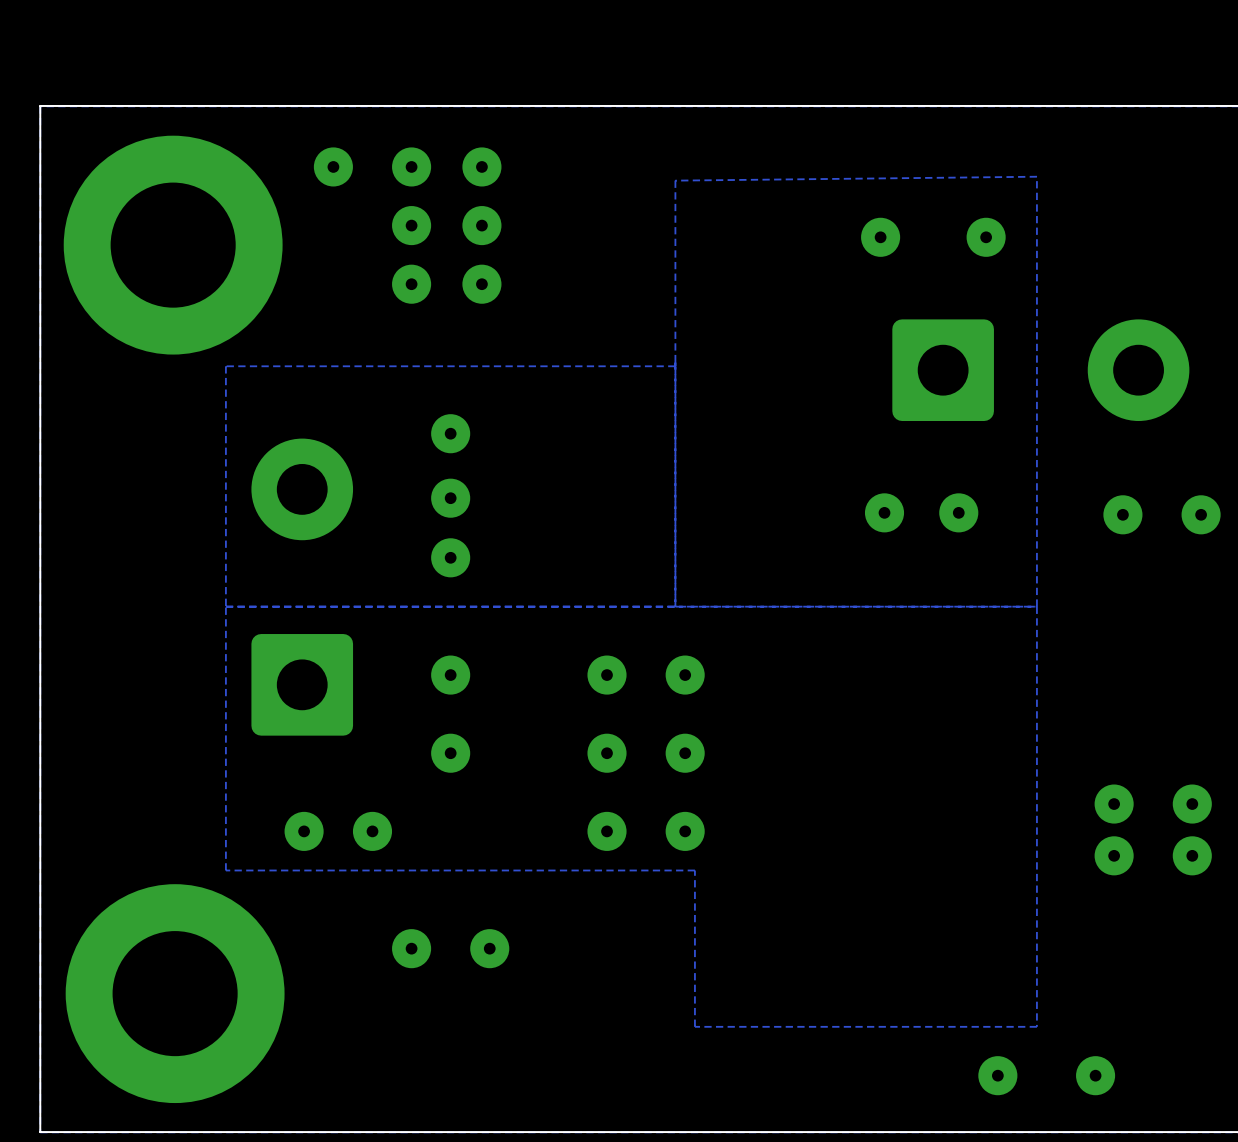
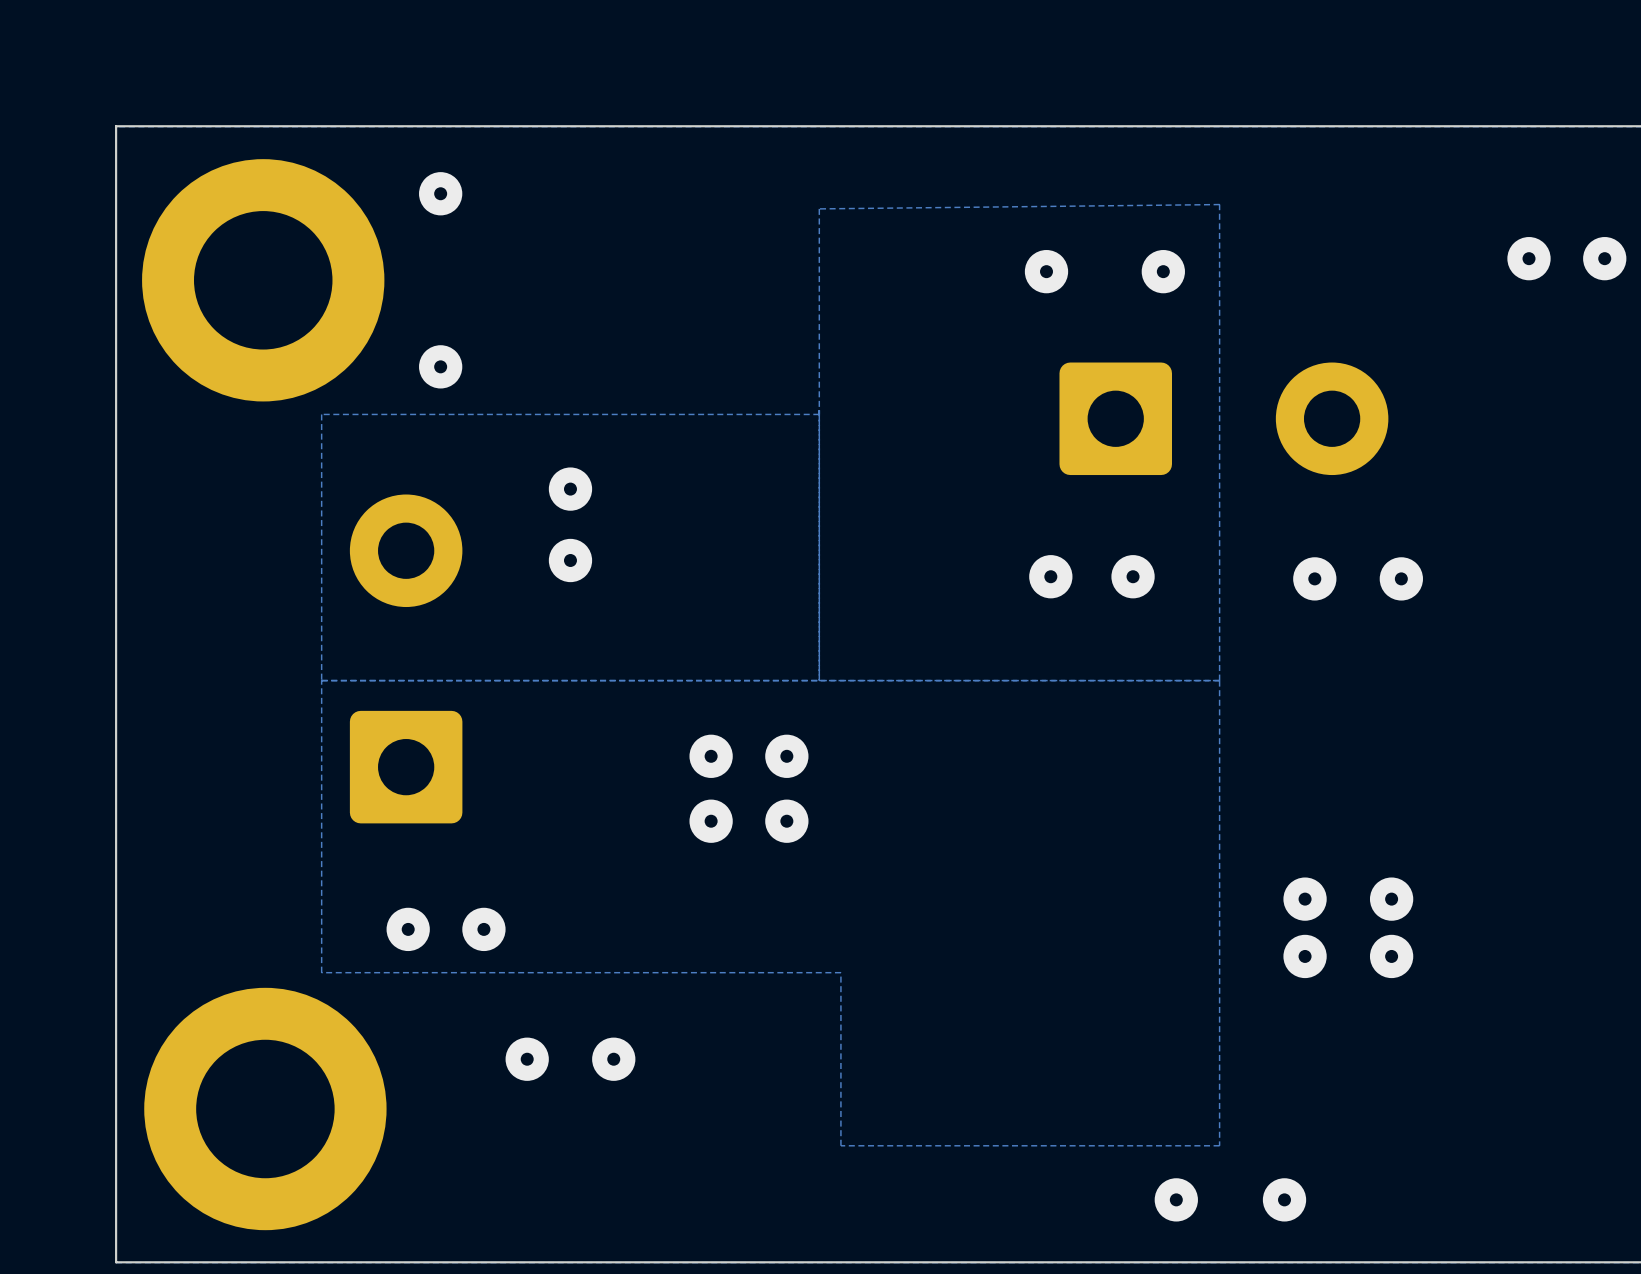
via: (411, 166) -> none
via: (481, 166) -> none
via: (411, 225) -> none
via: (481, 225) -> none
via: (411, 284) -> none
via: (481, 284) -> none
via: none -> (440, 366)
via: (450, 557) -> none
via: (450, 675) -> none
via: none -> (711, 756)
via: (607, 675) -> none
via: none -> (786, 756)
via: (685, 675) -> none
via: none -> (711, 821)
via: none -> (786, 821)
via: (450, 753) -> none
via: (607, 753) -> none
via: (685, 753) -> none
via: (607, 831) -> none
via: (685, 831) -> none

